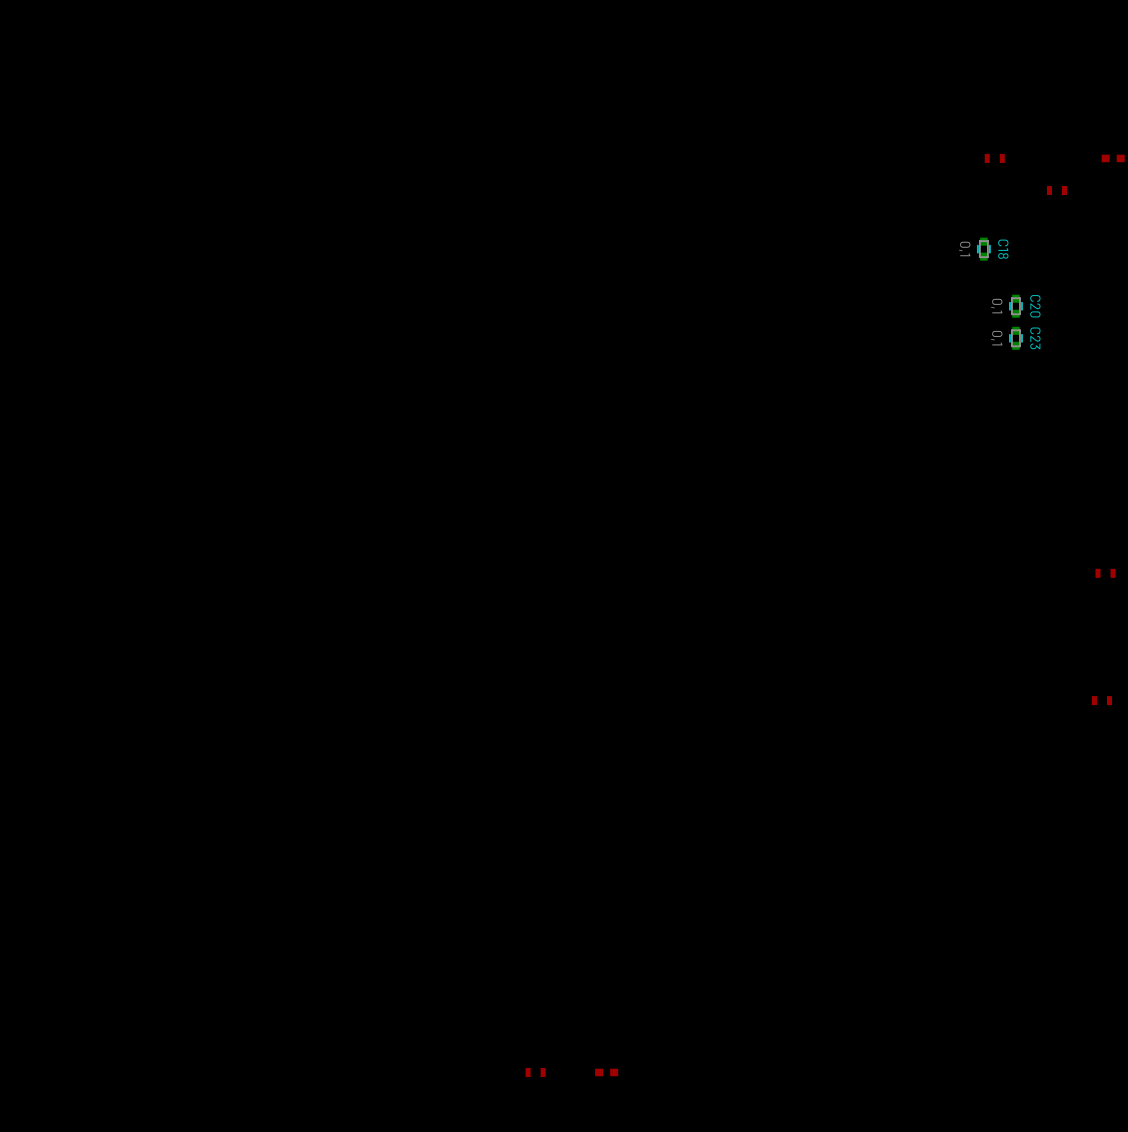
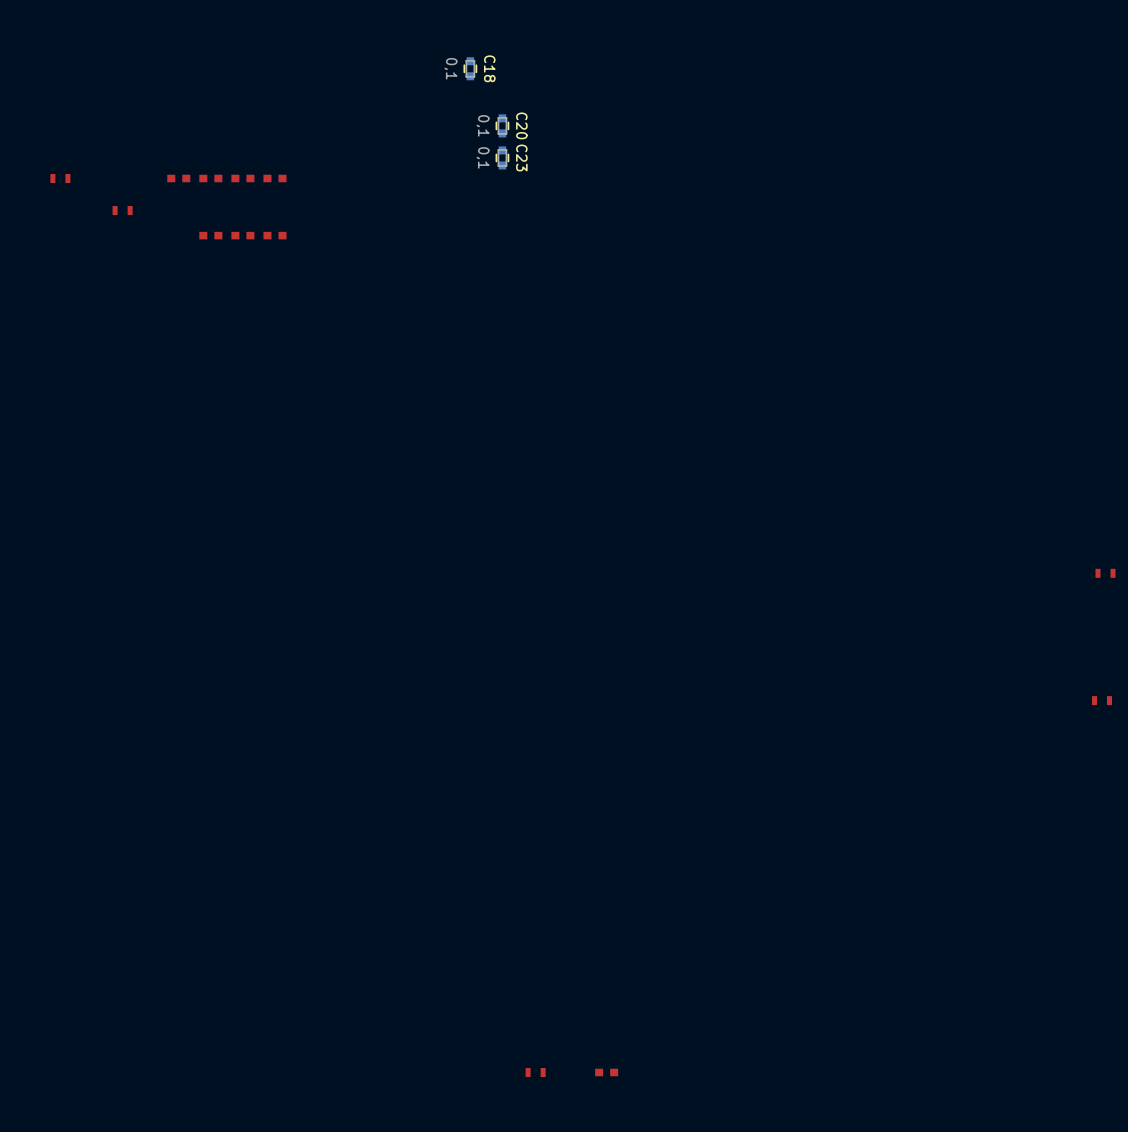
part: (994, 158) -> none
part: (1113, 158) -> none
part: none -> (60, 178)
part: none -> (178, 178)
part: none -> (210, 178)
part: none -> (242, 178)
part: none -> (274, 178)
part: (1056, 190) -> none
part: none -> (122, 210)
part: none -> (210, 235)
part: none -> (242, 235)
part: none -> (274, 235)
C18 position: (983, 249) -> (470, 68)
C20 position: (1015, 306) -> (502, 125)
C23 position: (1015, 338) -> (502, 157)

